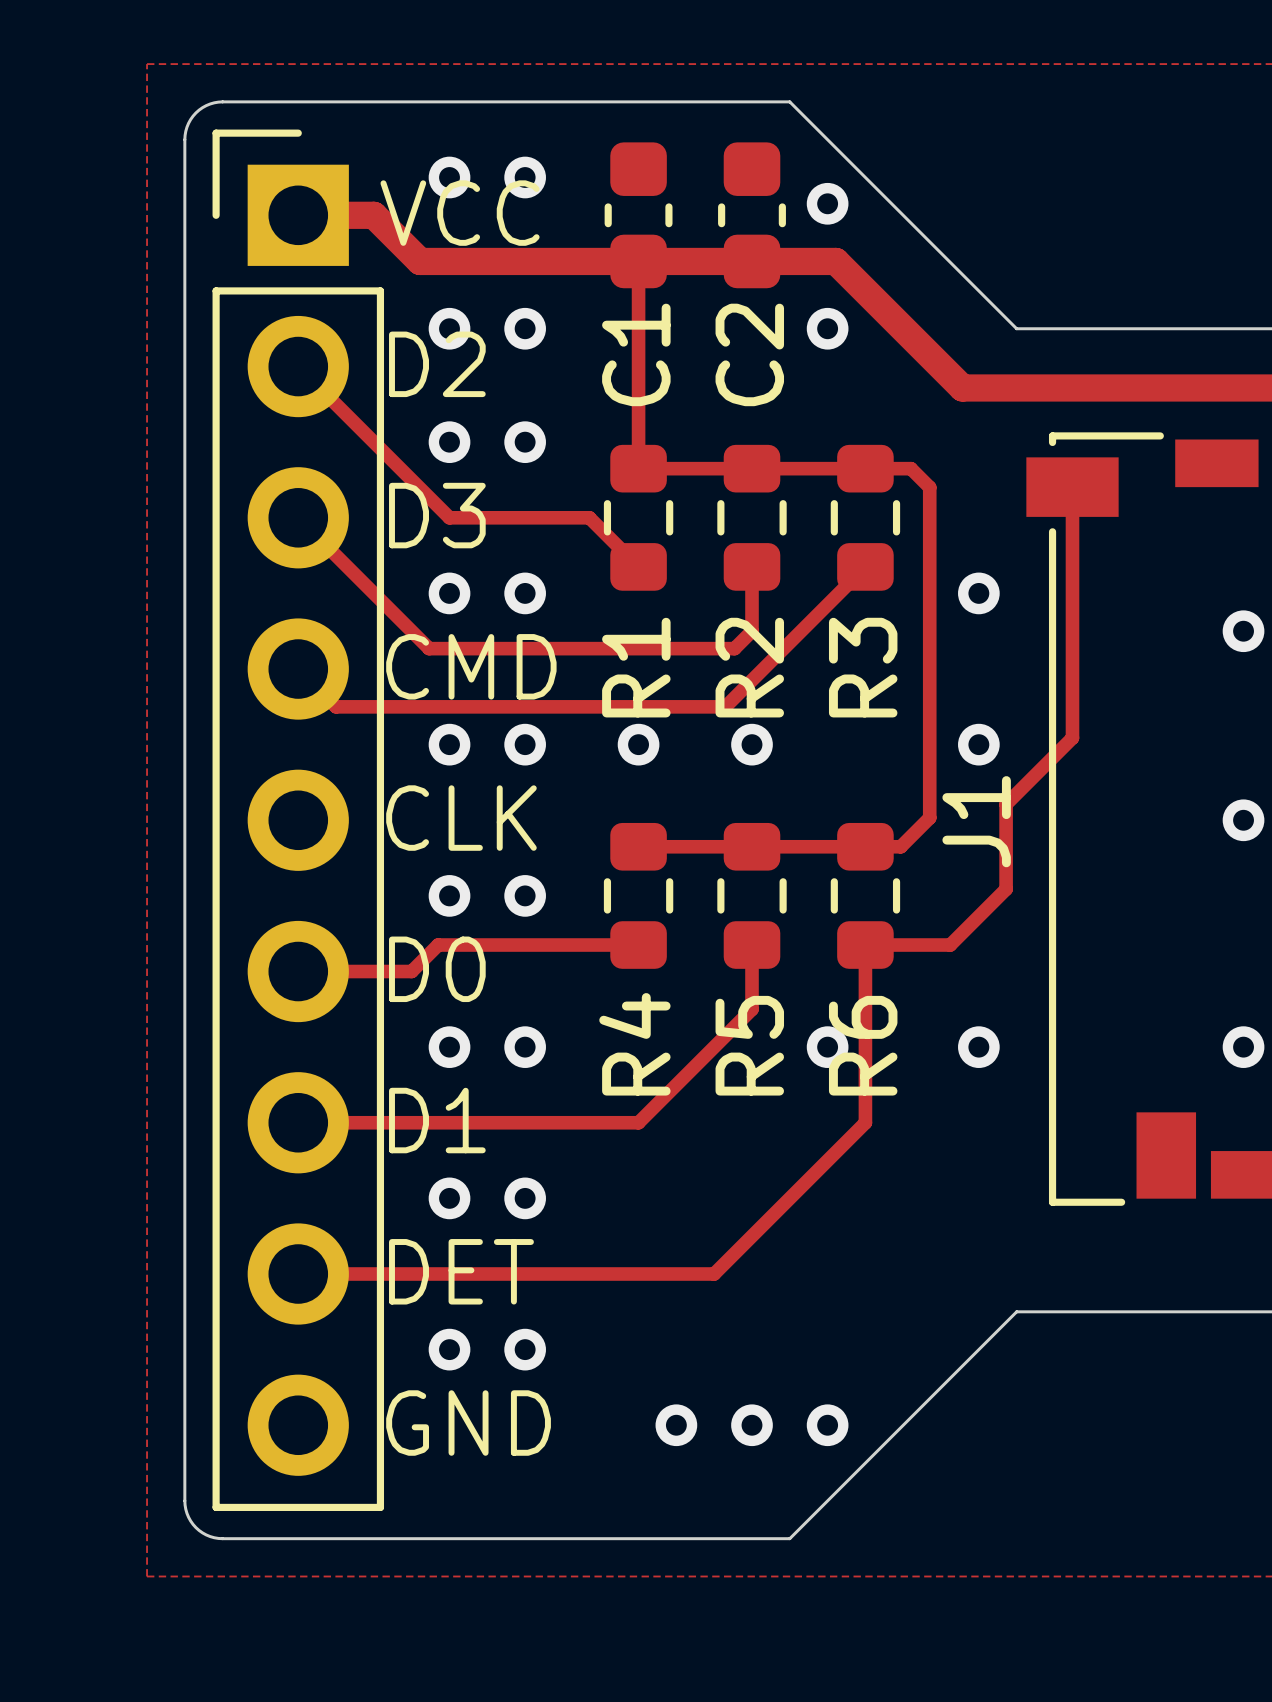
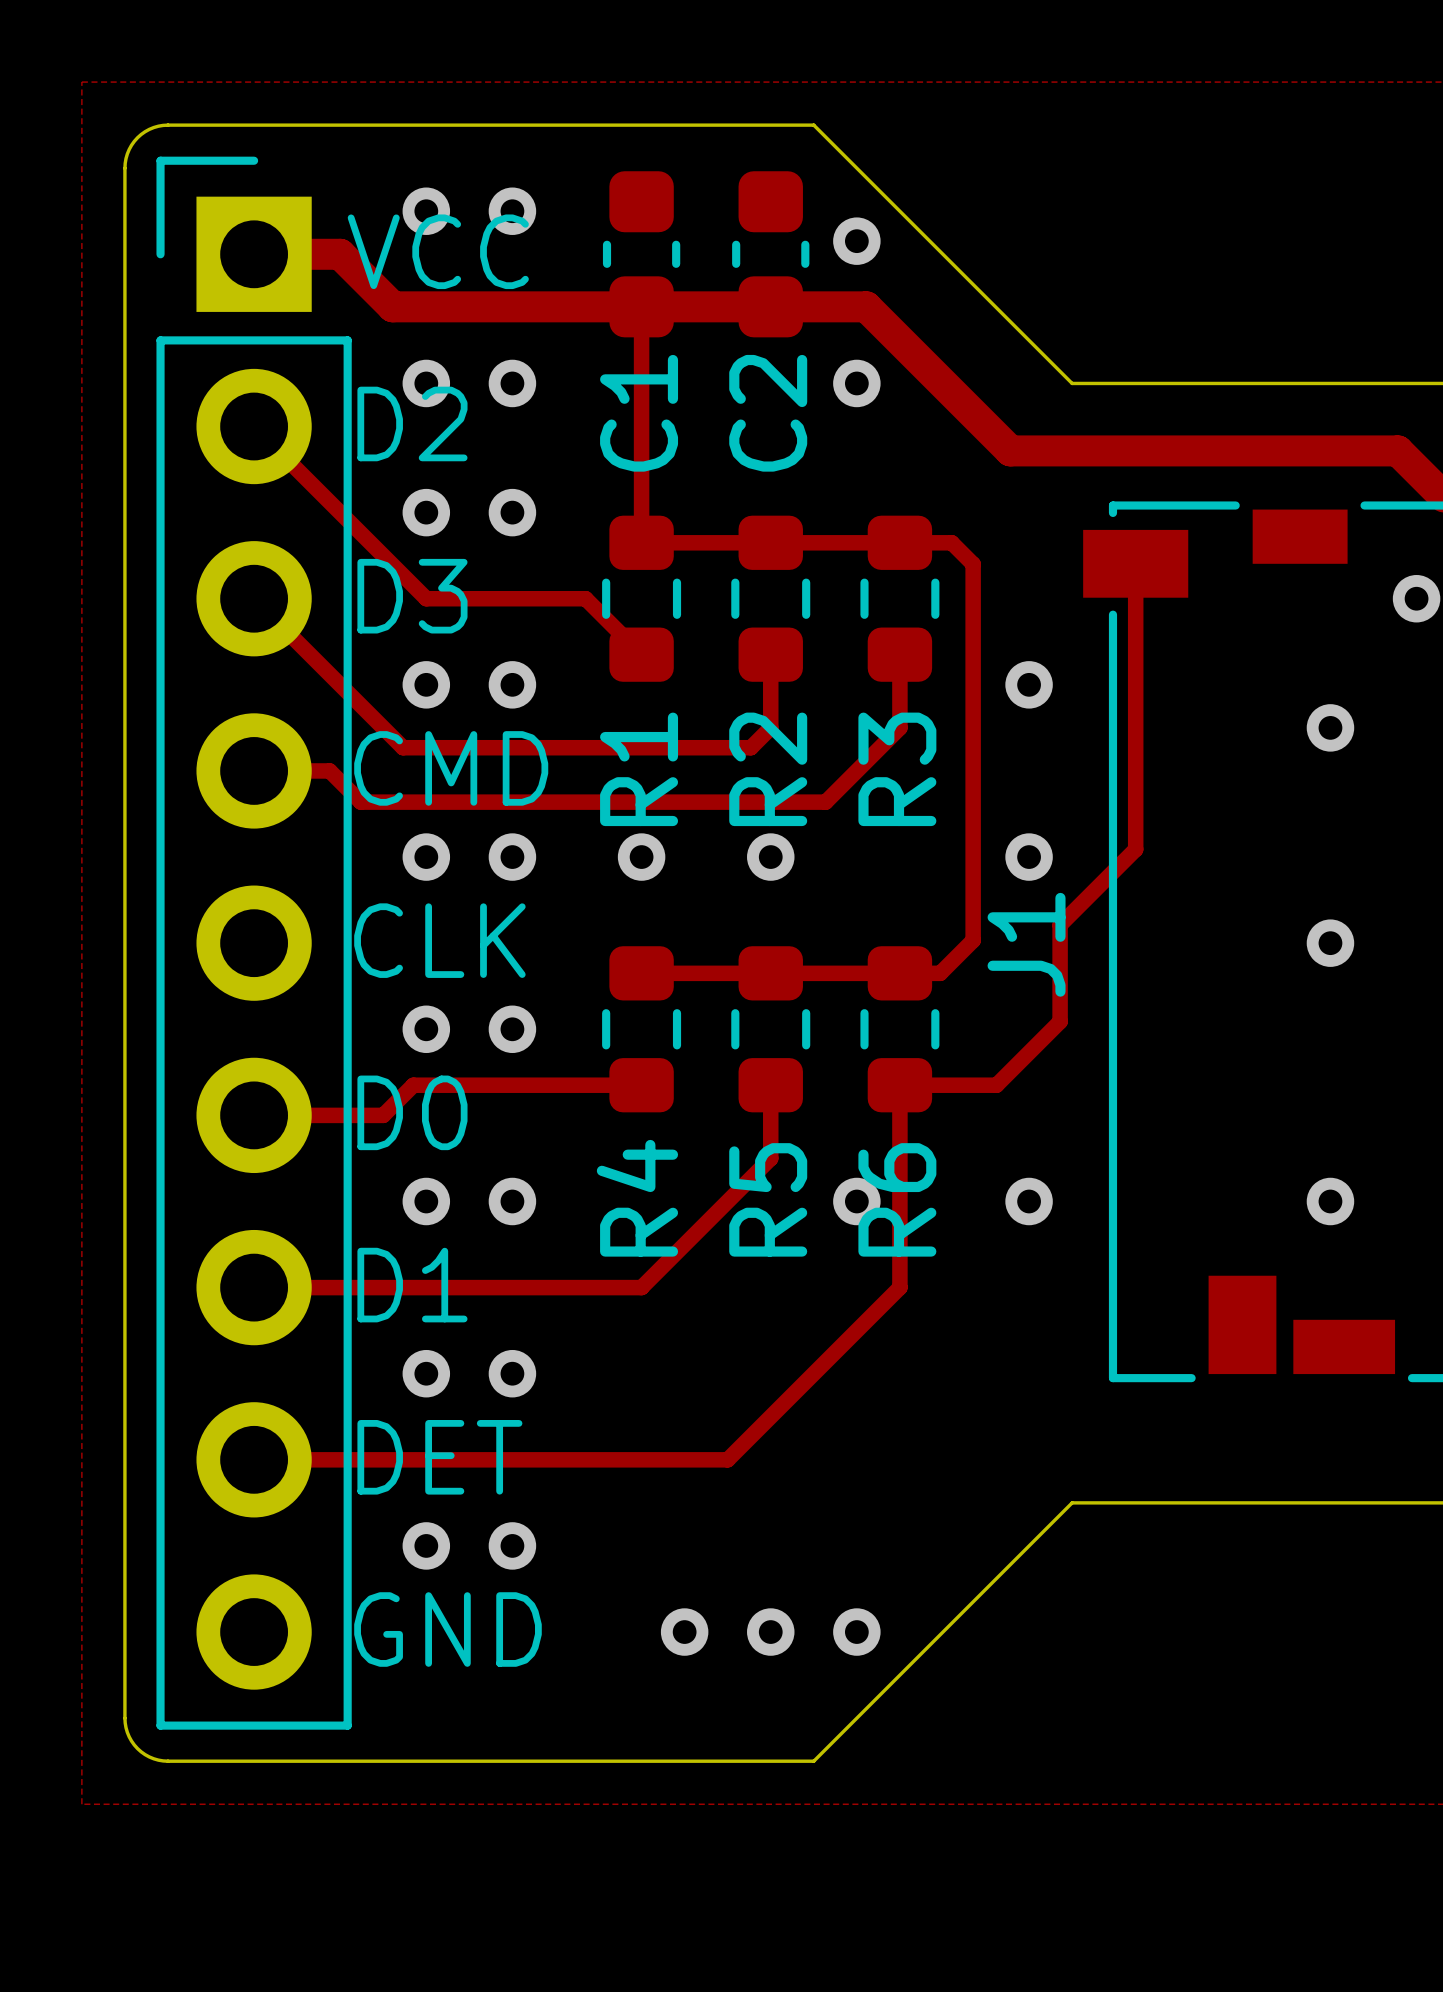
track: (865, 566) (725, 706) (336, 706) (298, 669) -> (899, 654) (899, 727) (825, 802) (360, 802) (329, 770) (254, 770)

